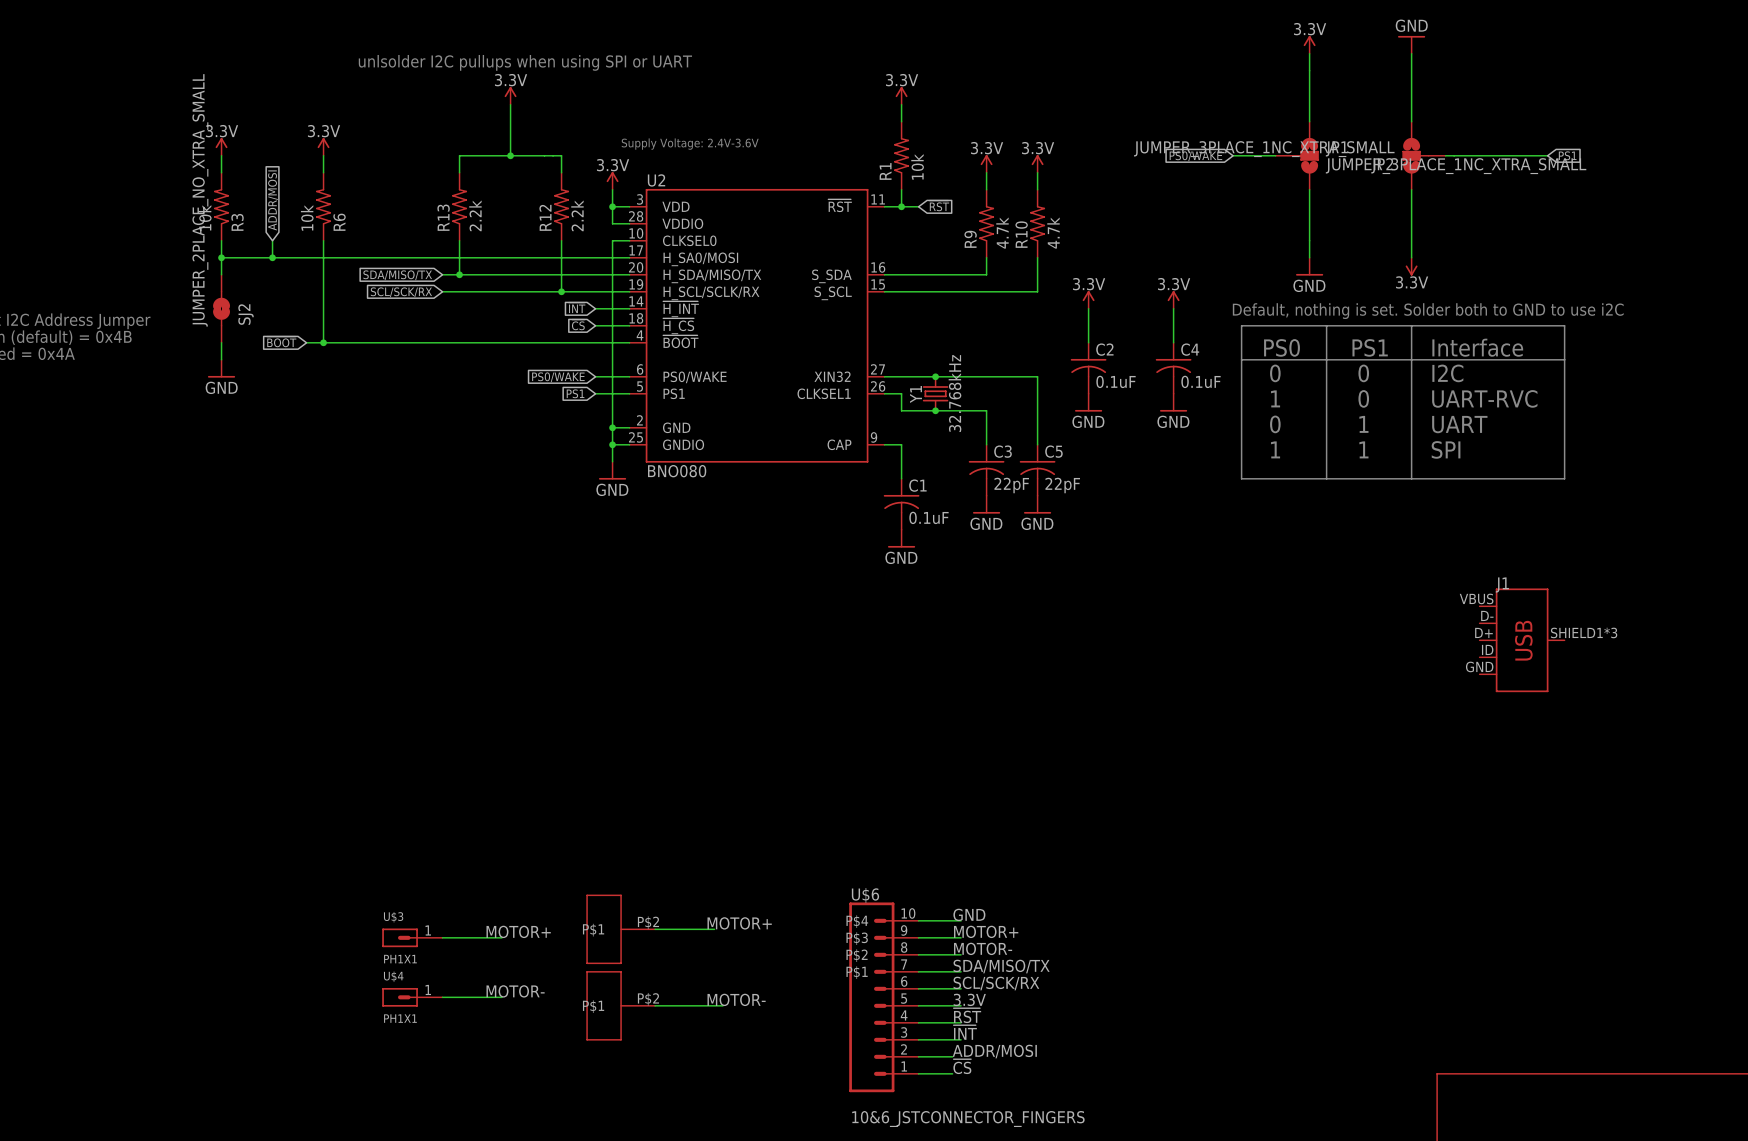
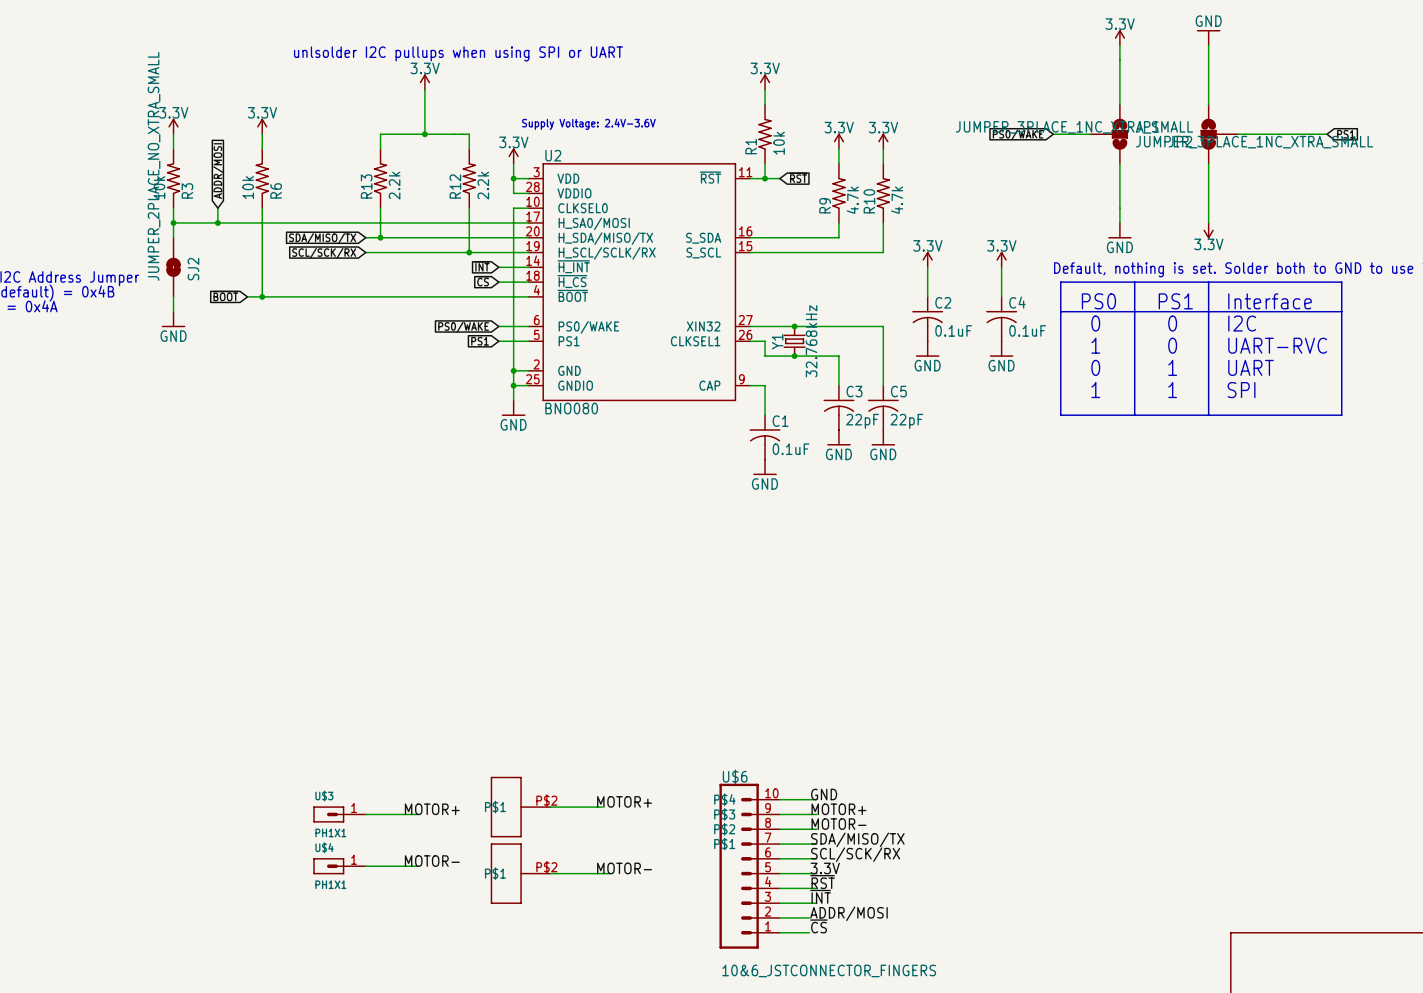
J1: (1522, 640) -> none

